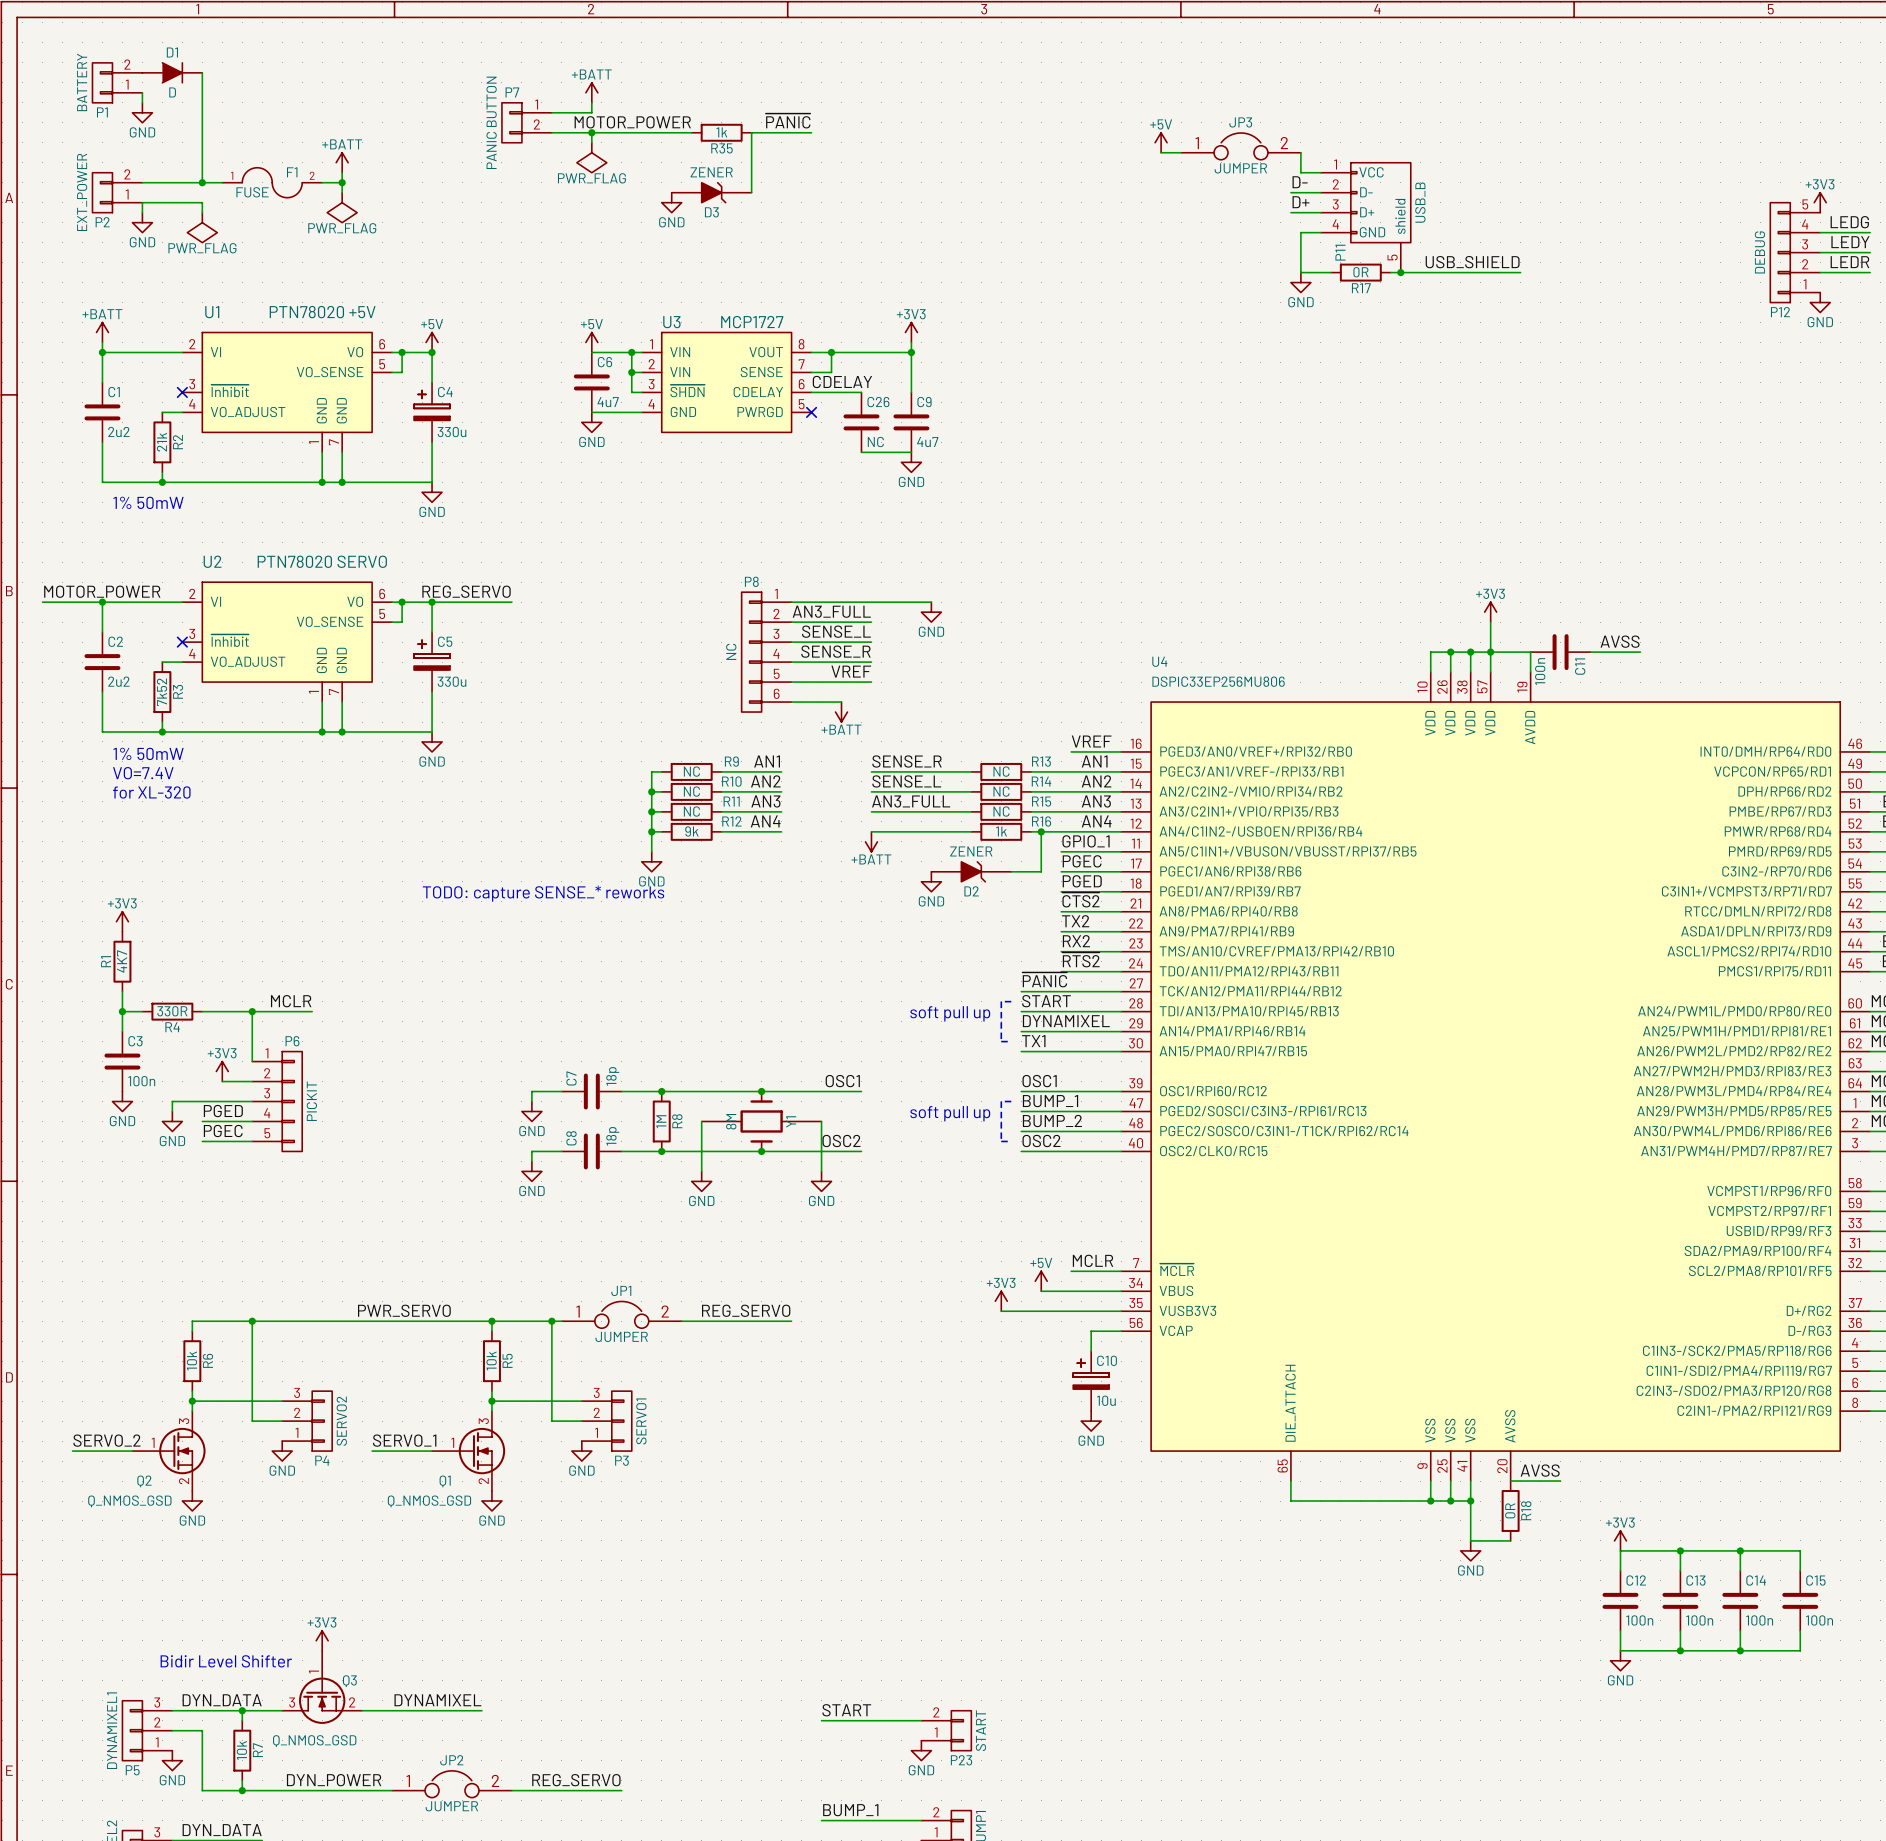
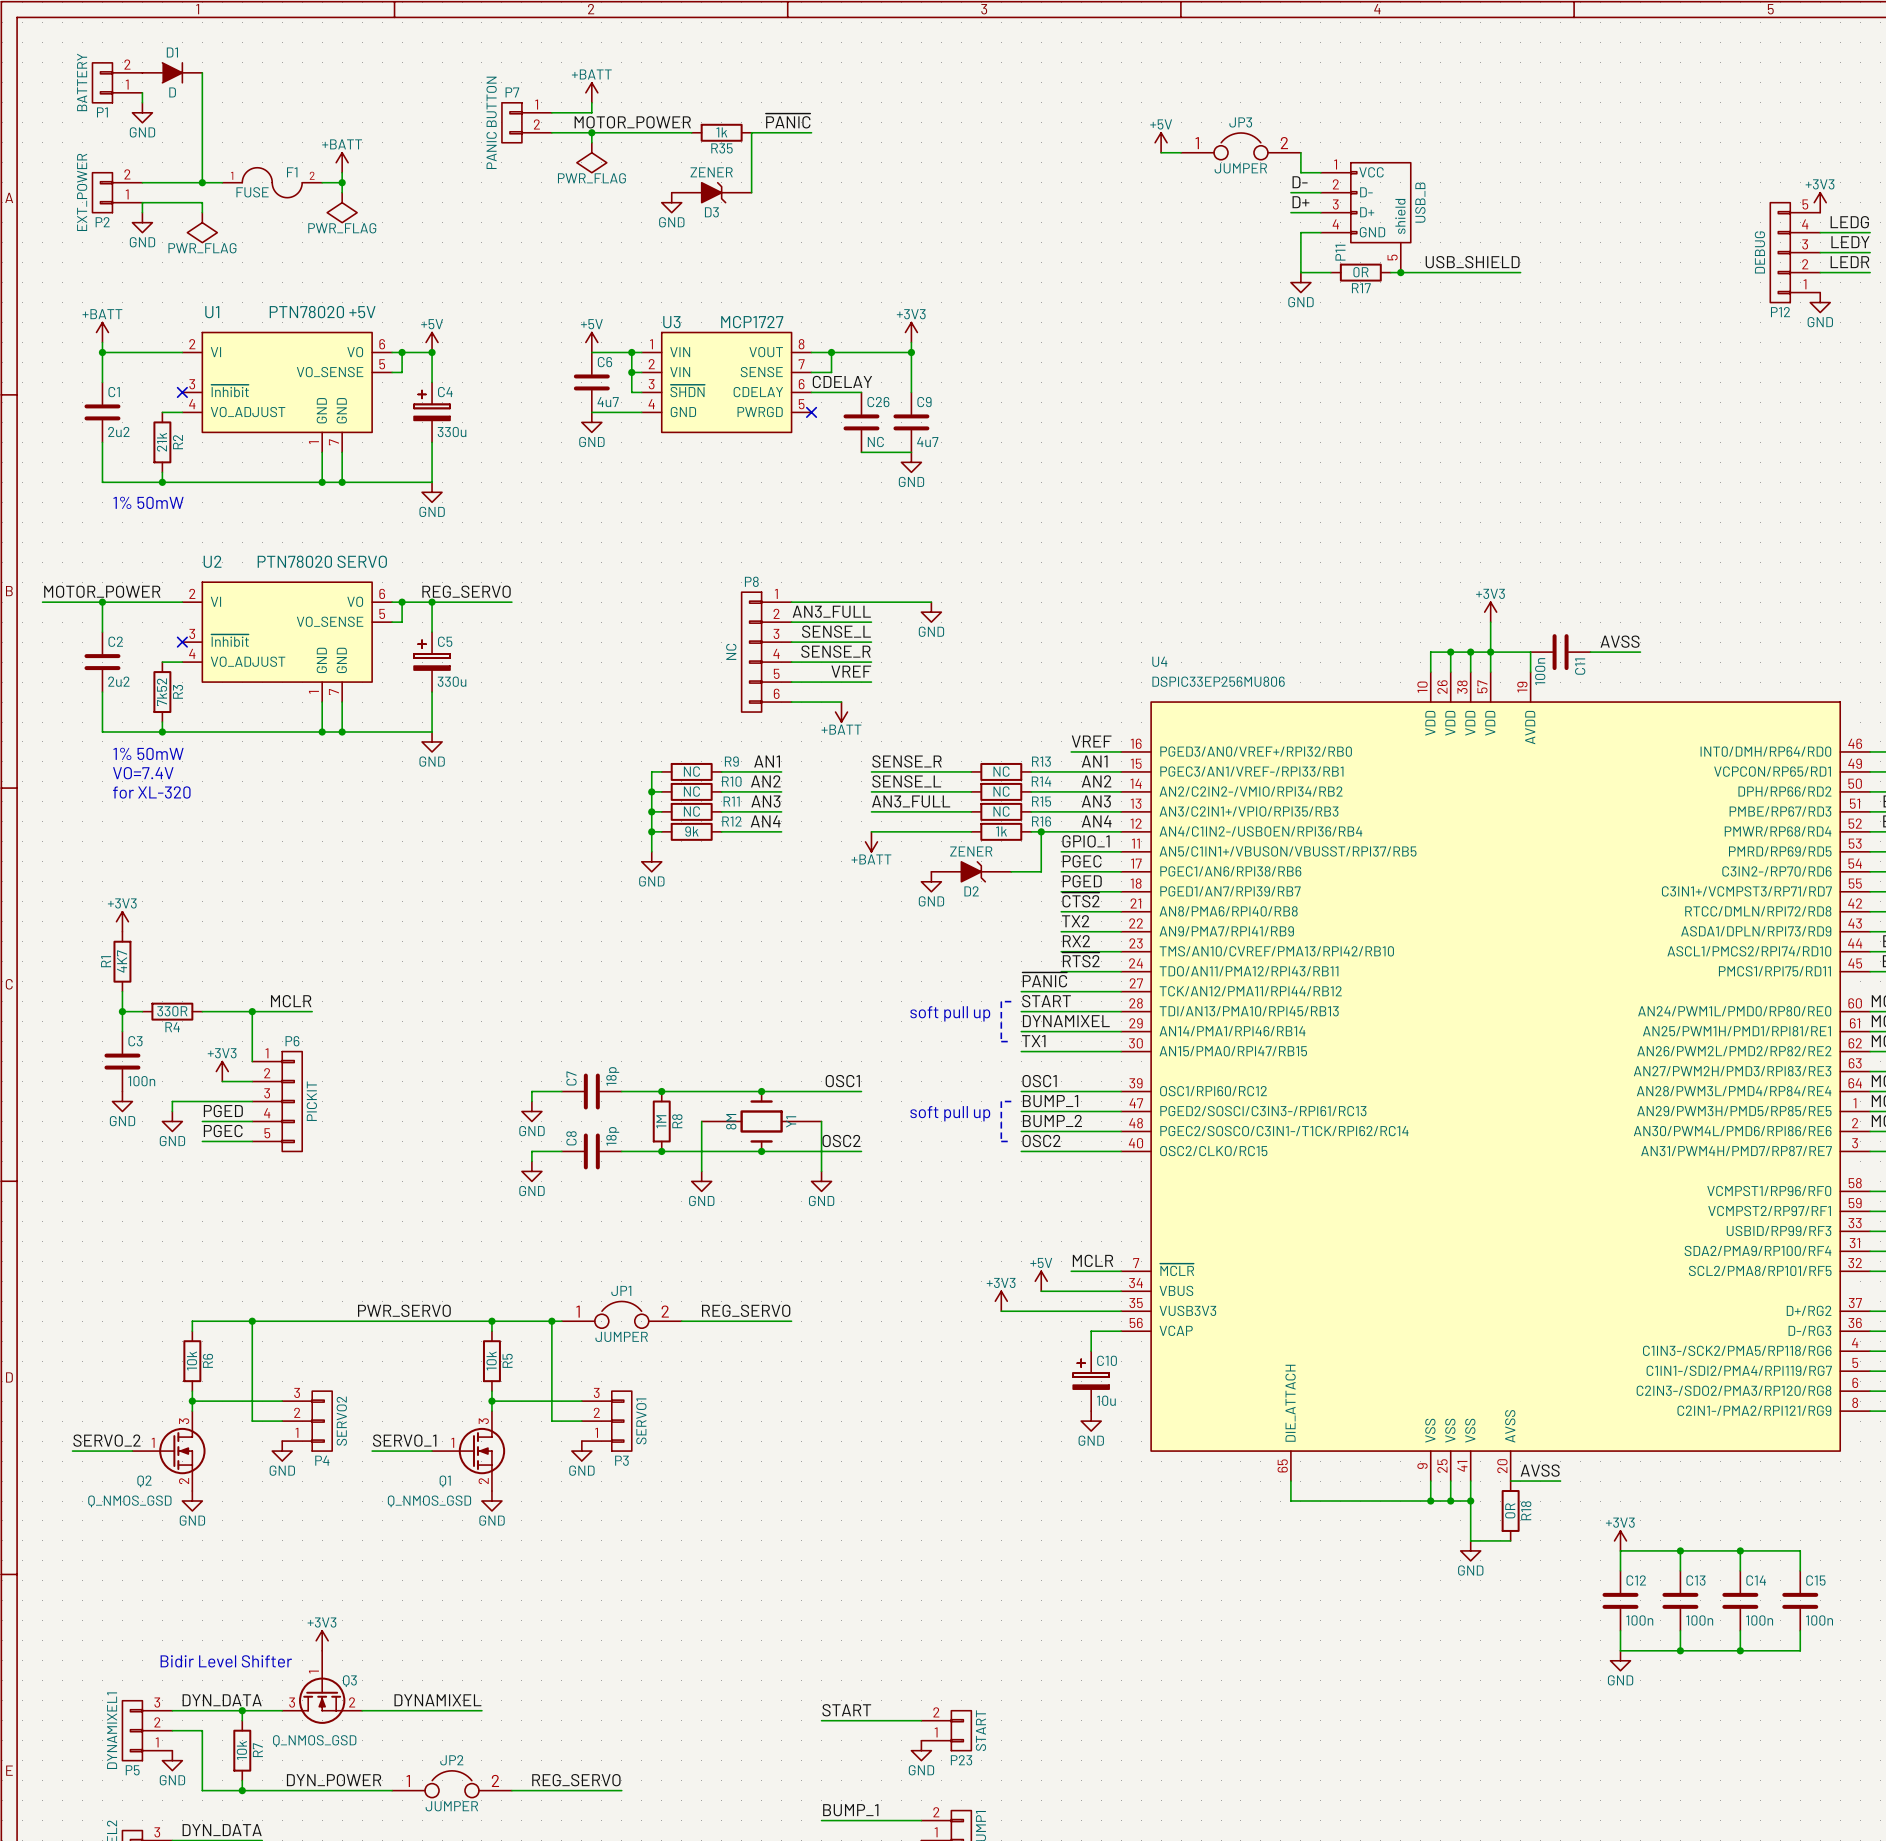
text: TODO: capture SENSE_* reworks (543, 893) -> none

